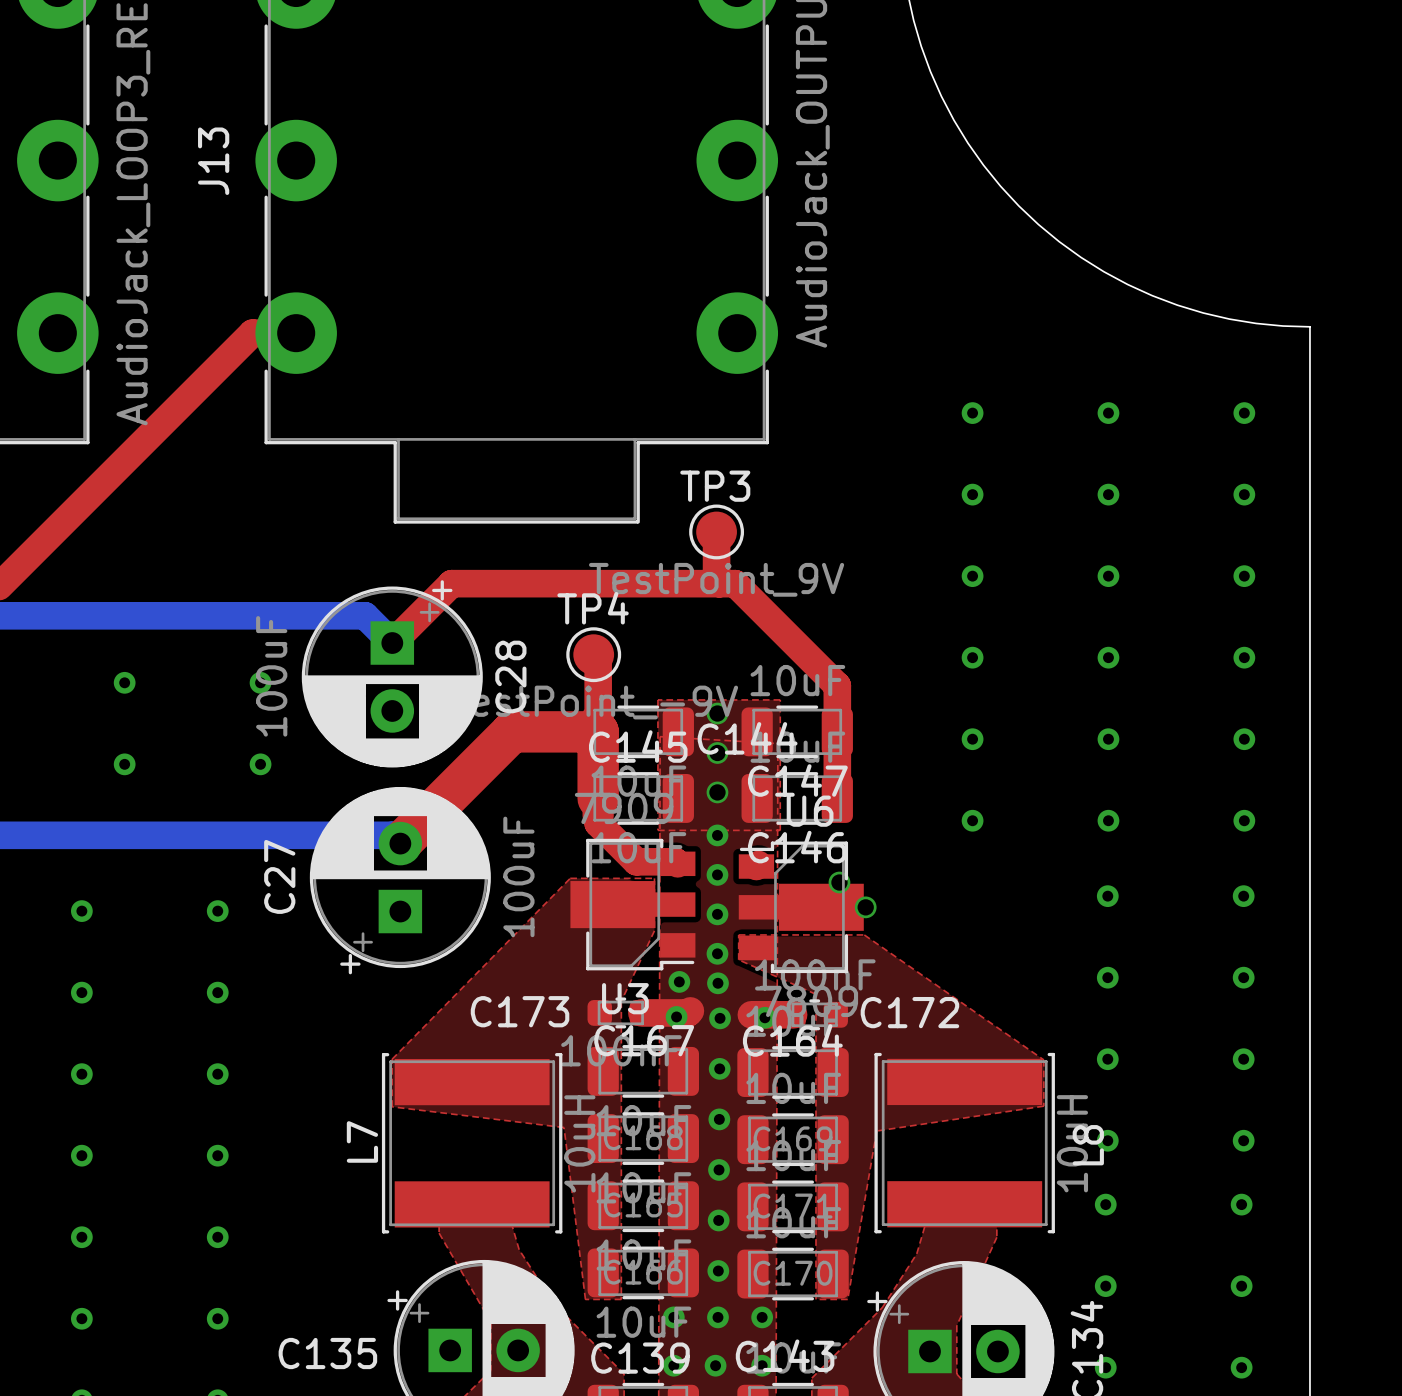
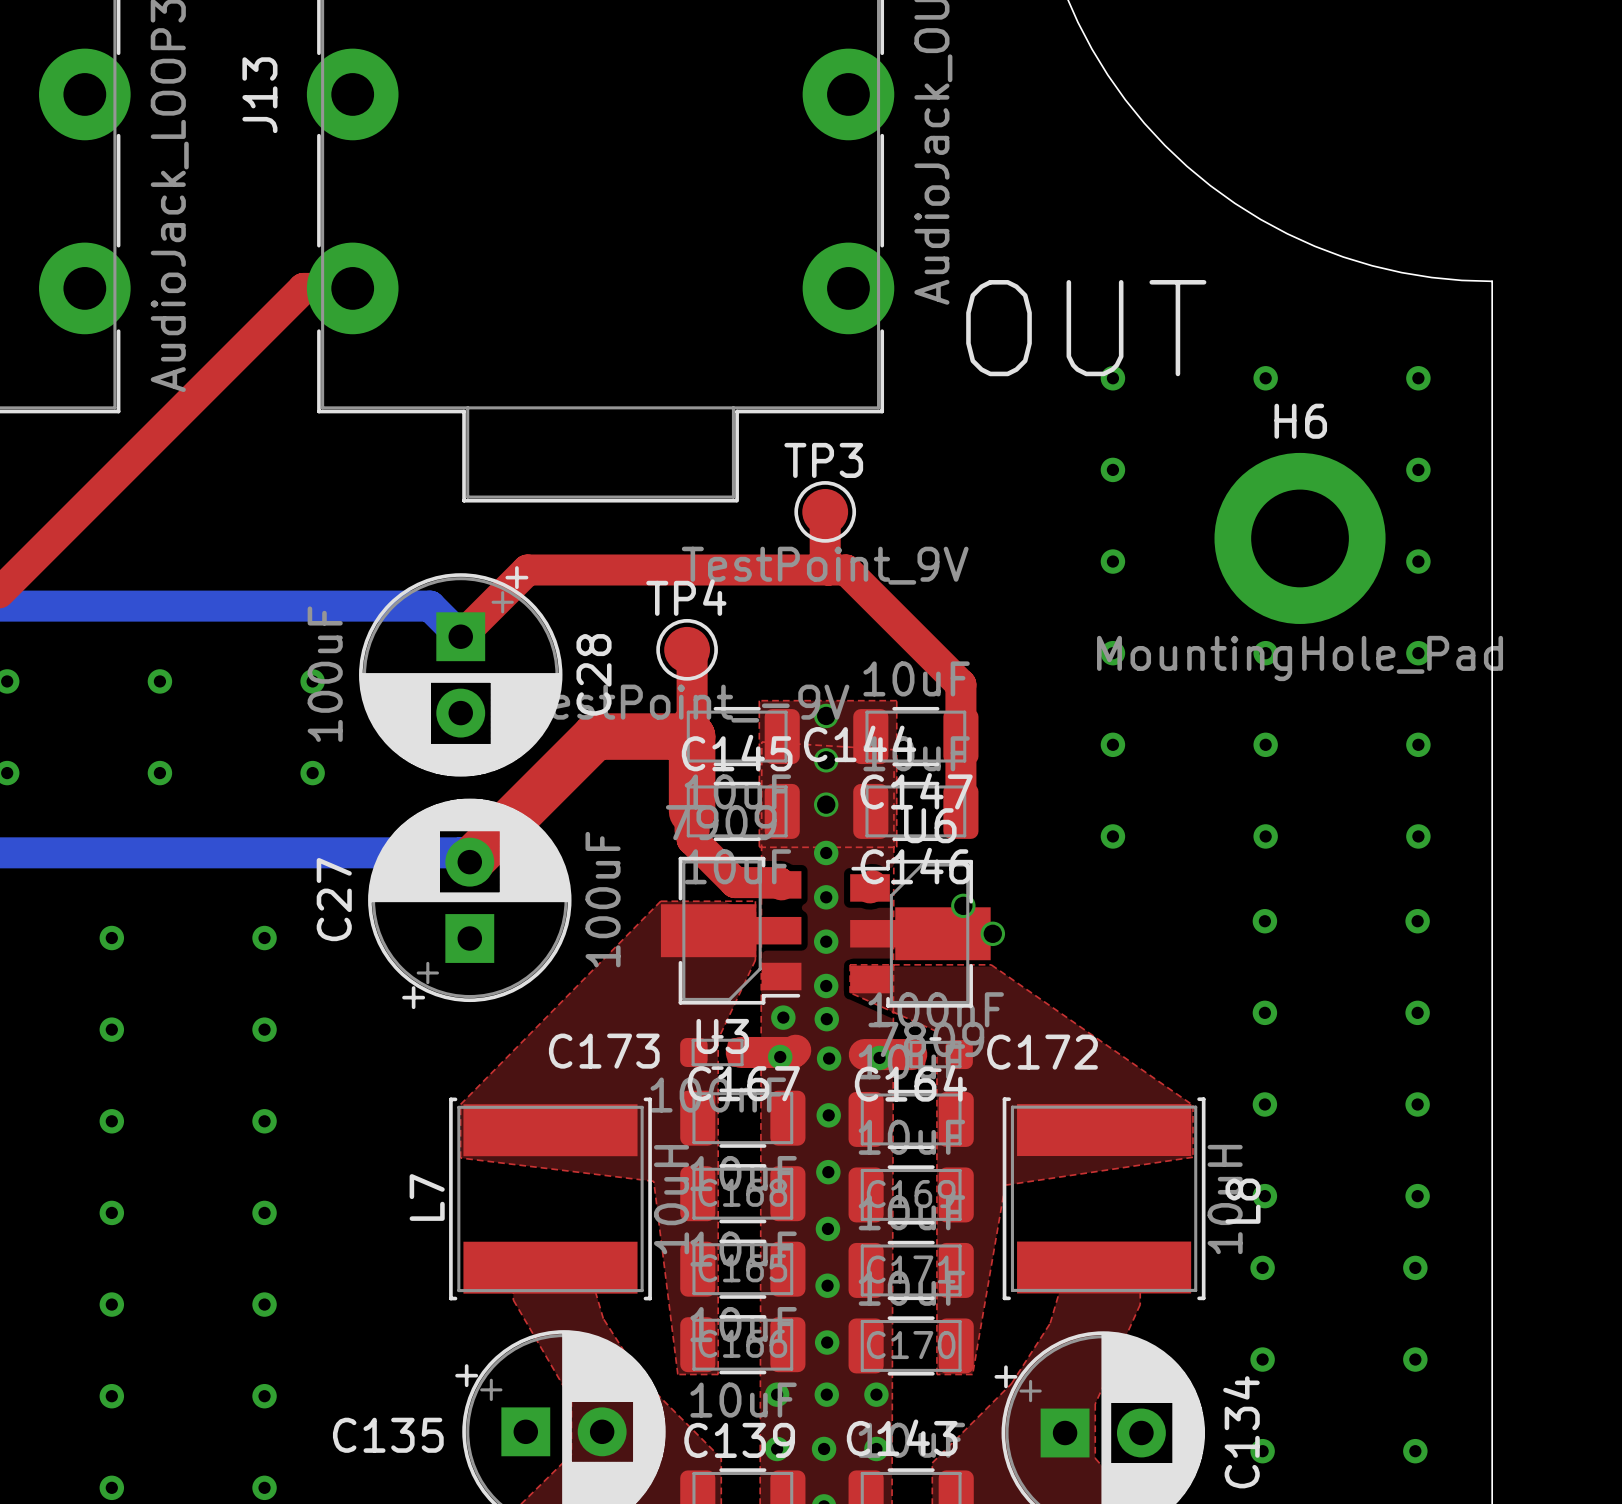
text: none -> OUT (1086, 328)
via: (1108, 494) -> none
H6: none -> MountingHole_Pad (1300, 538)
via: (1108, 576) -> none

